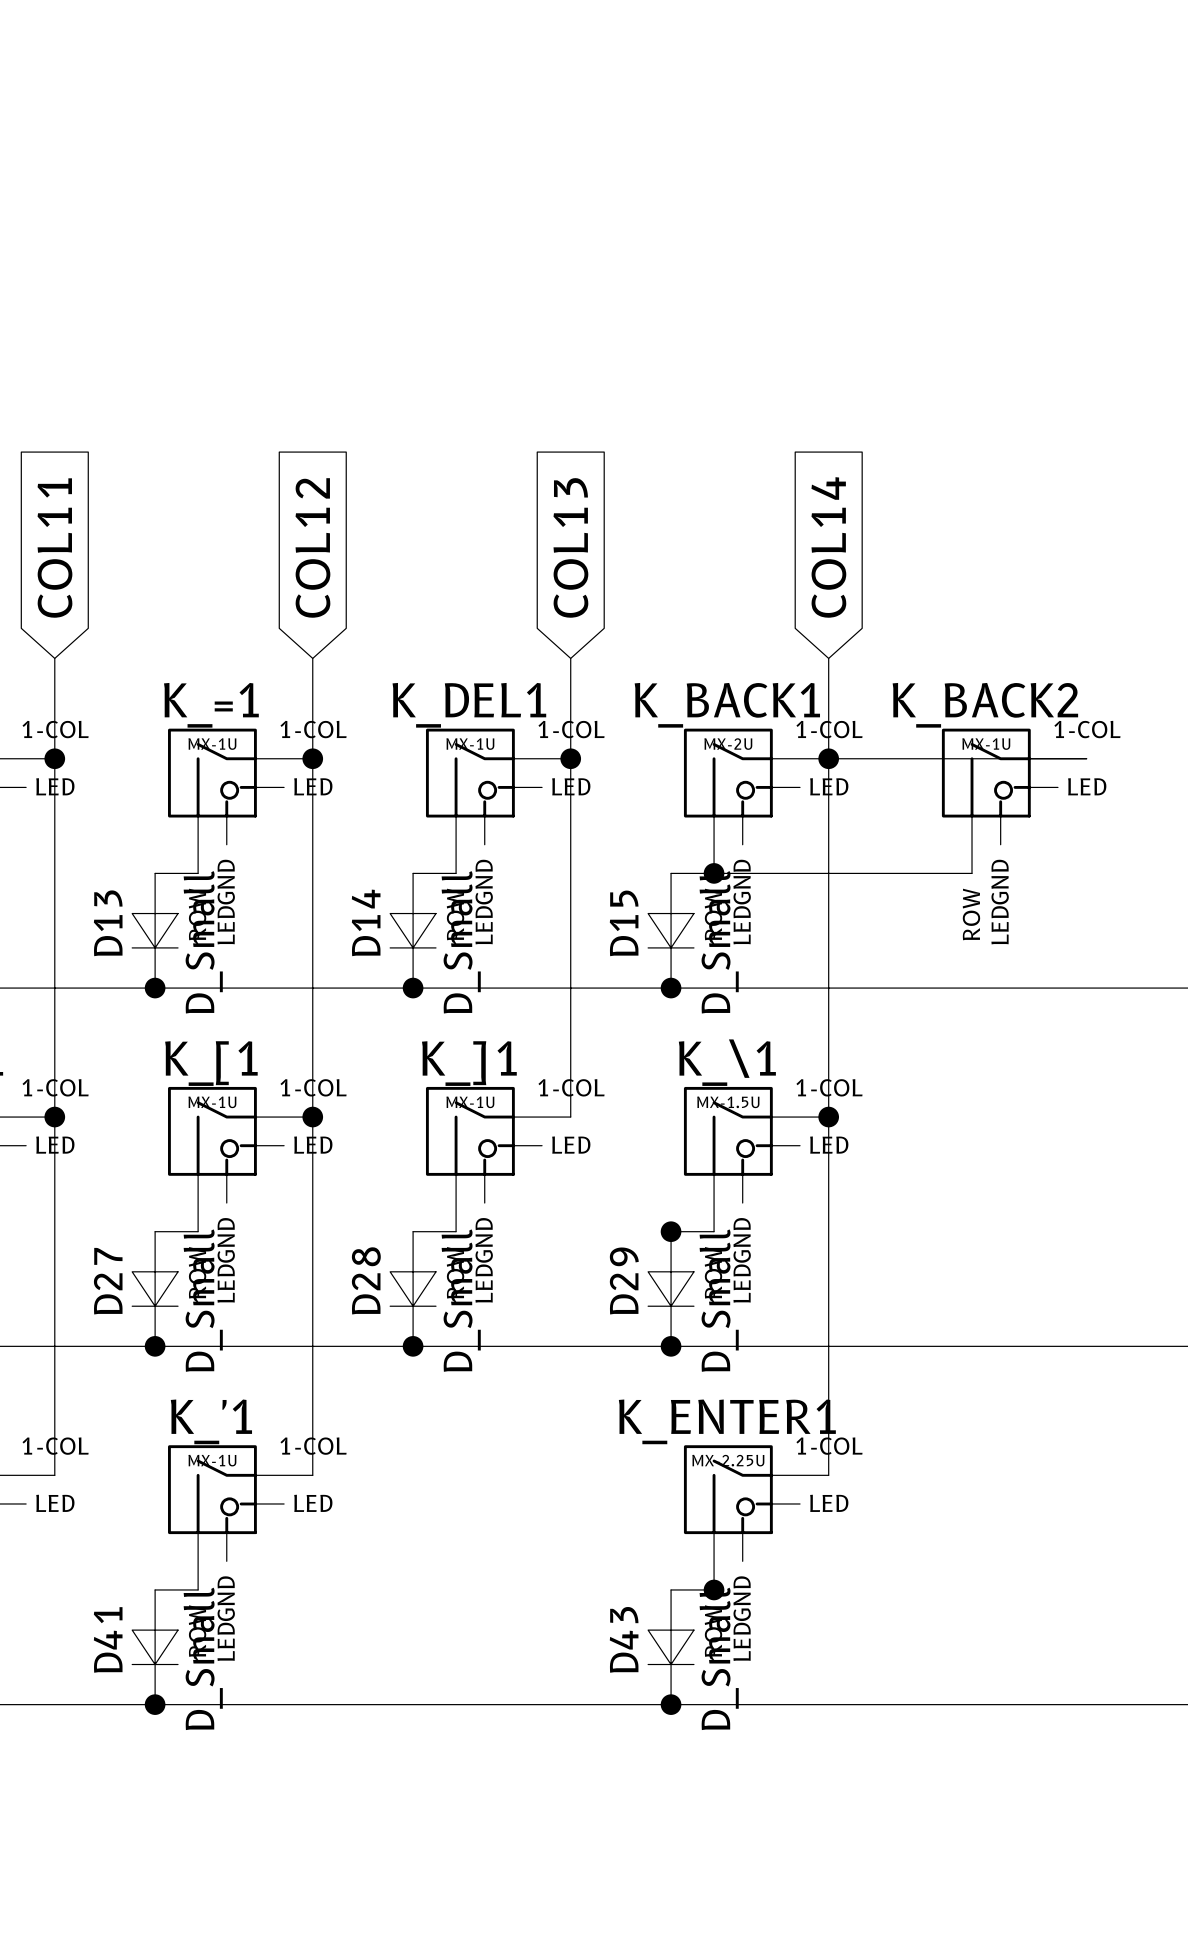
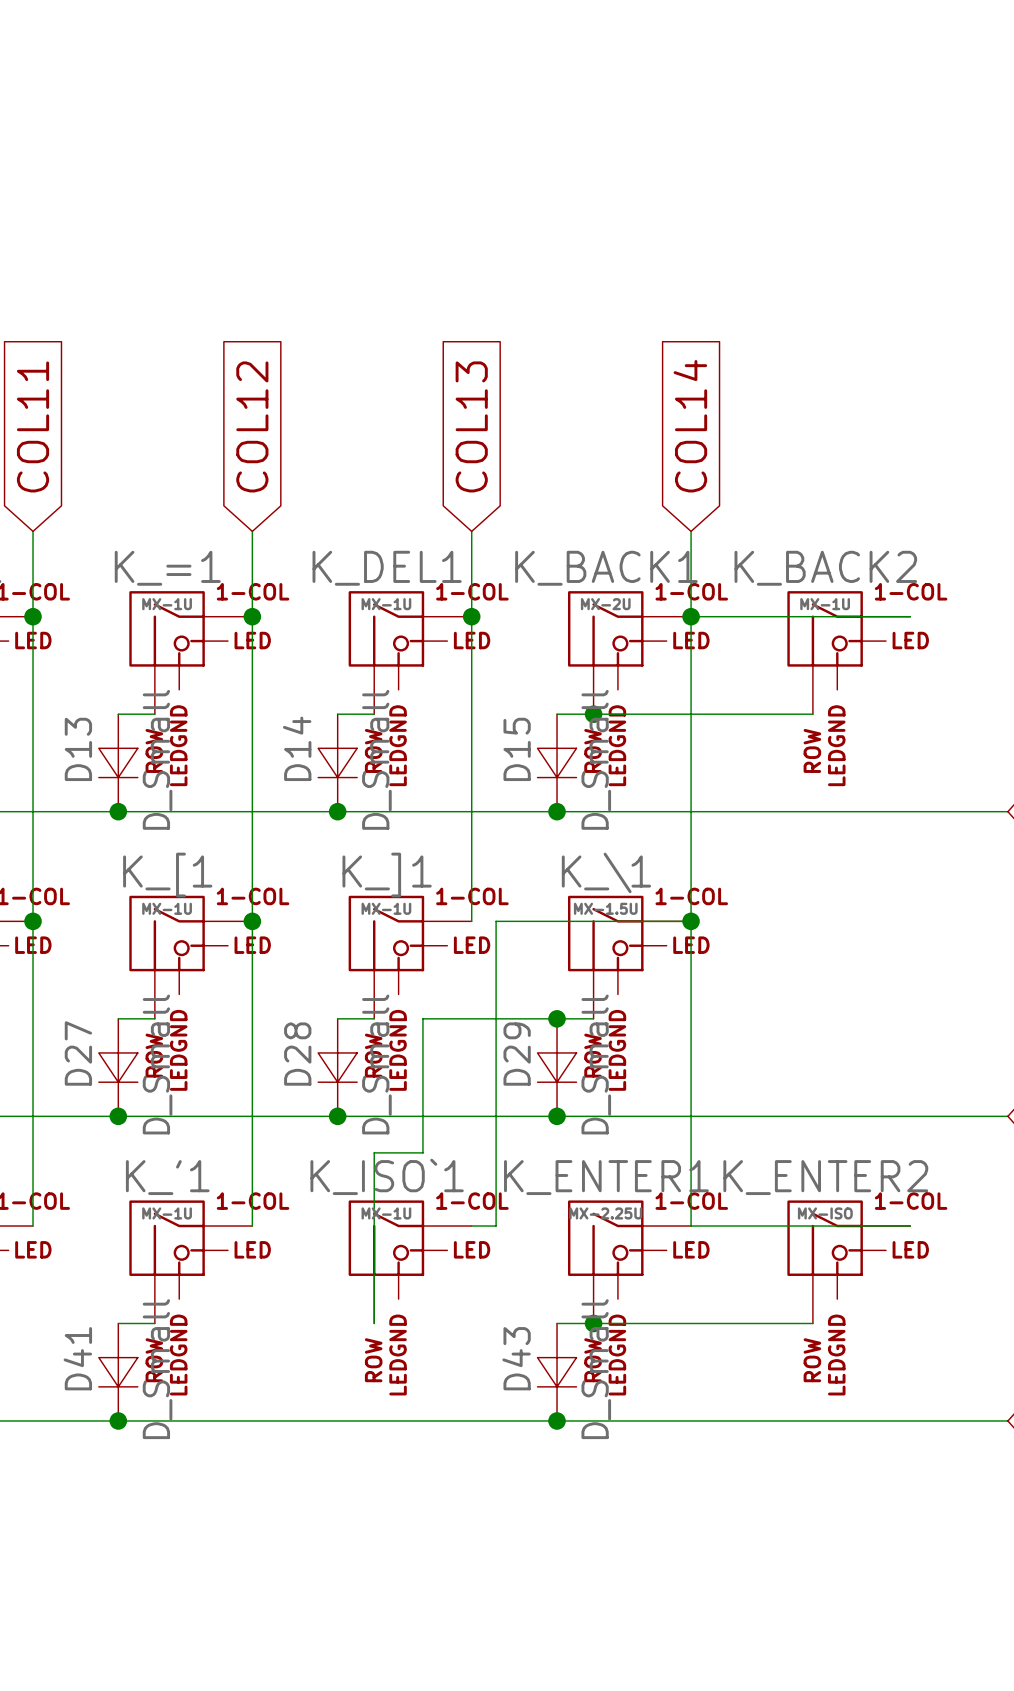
wire: none -> (691, 921) (496, 921) (496, 1226) (471, 1226)
wire: none -> (557, 1018) (422, 1018) (422, 1152) (374, 1152) (374, 1323)
wire: none -> (691, 1226) (910, 1226)
K_ISO`1: none -> MX-1U (410, 1261)
K_ENTER2: none -> MX-ISO (848, 1261)
wire: none -> (593, 1323) (812, 1323)

